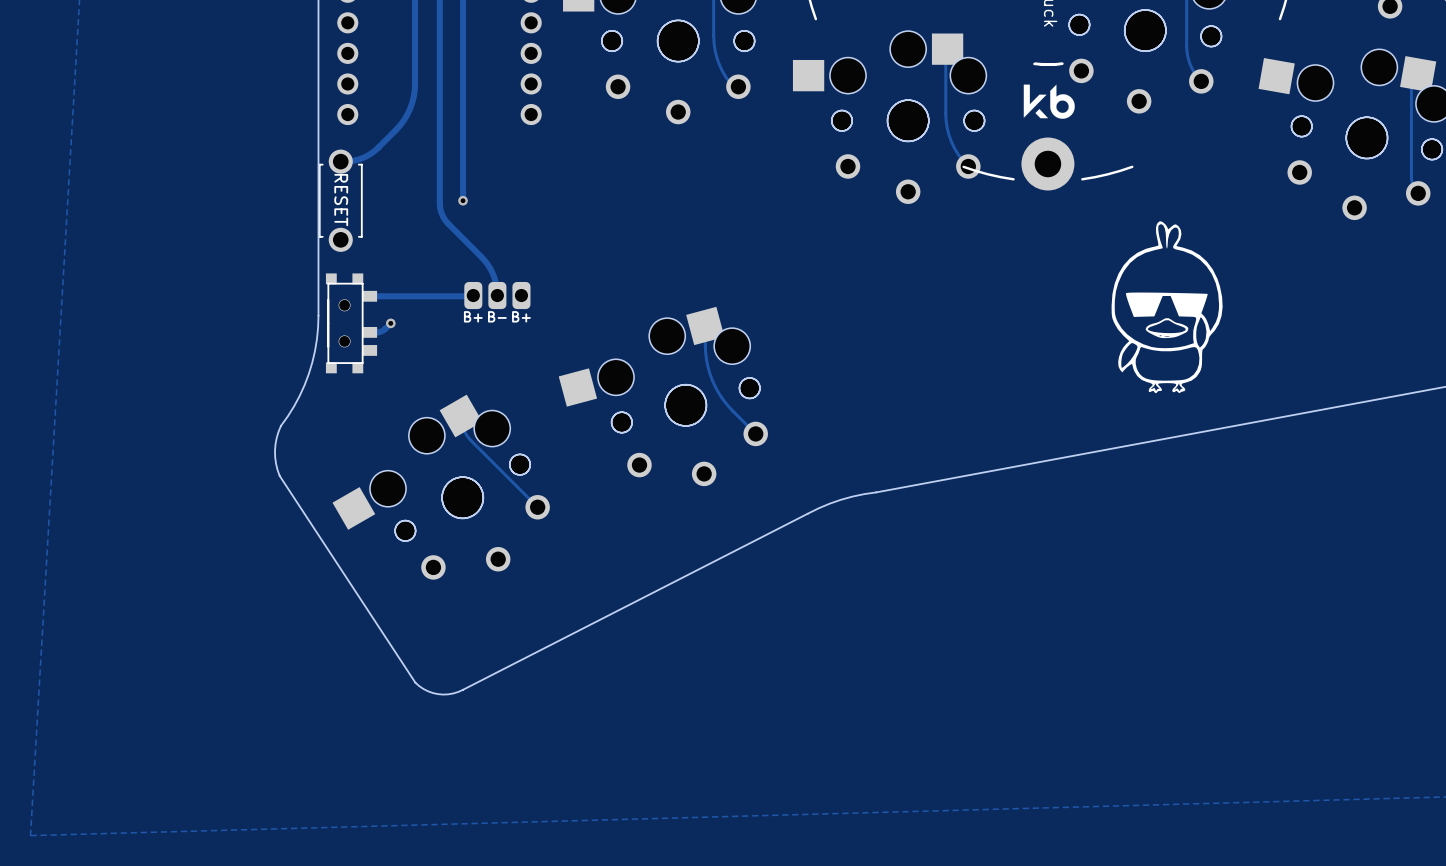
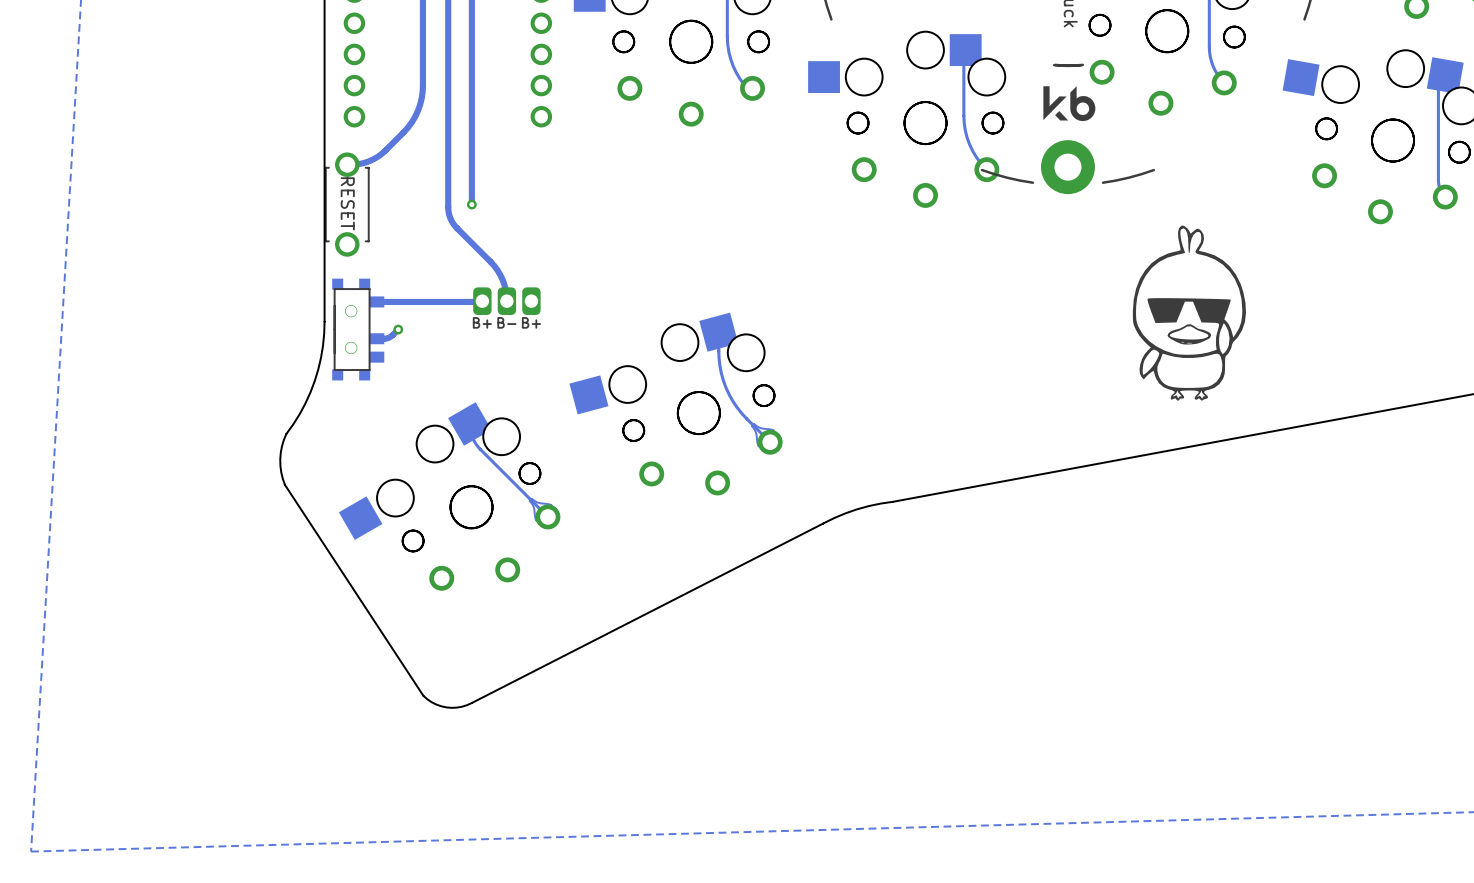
zone outline: none -> (753, 423) (759, 427) (774, 430) (774, 446) (758, 446) (755, 431) (751, 425) (753, 423)
zone outline: none -> (531, 498) (537, 502) (552, 505) (552, 521) (536, 521) (533, 506) (529, 500) (531, 498)

